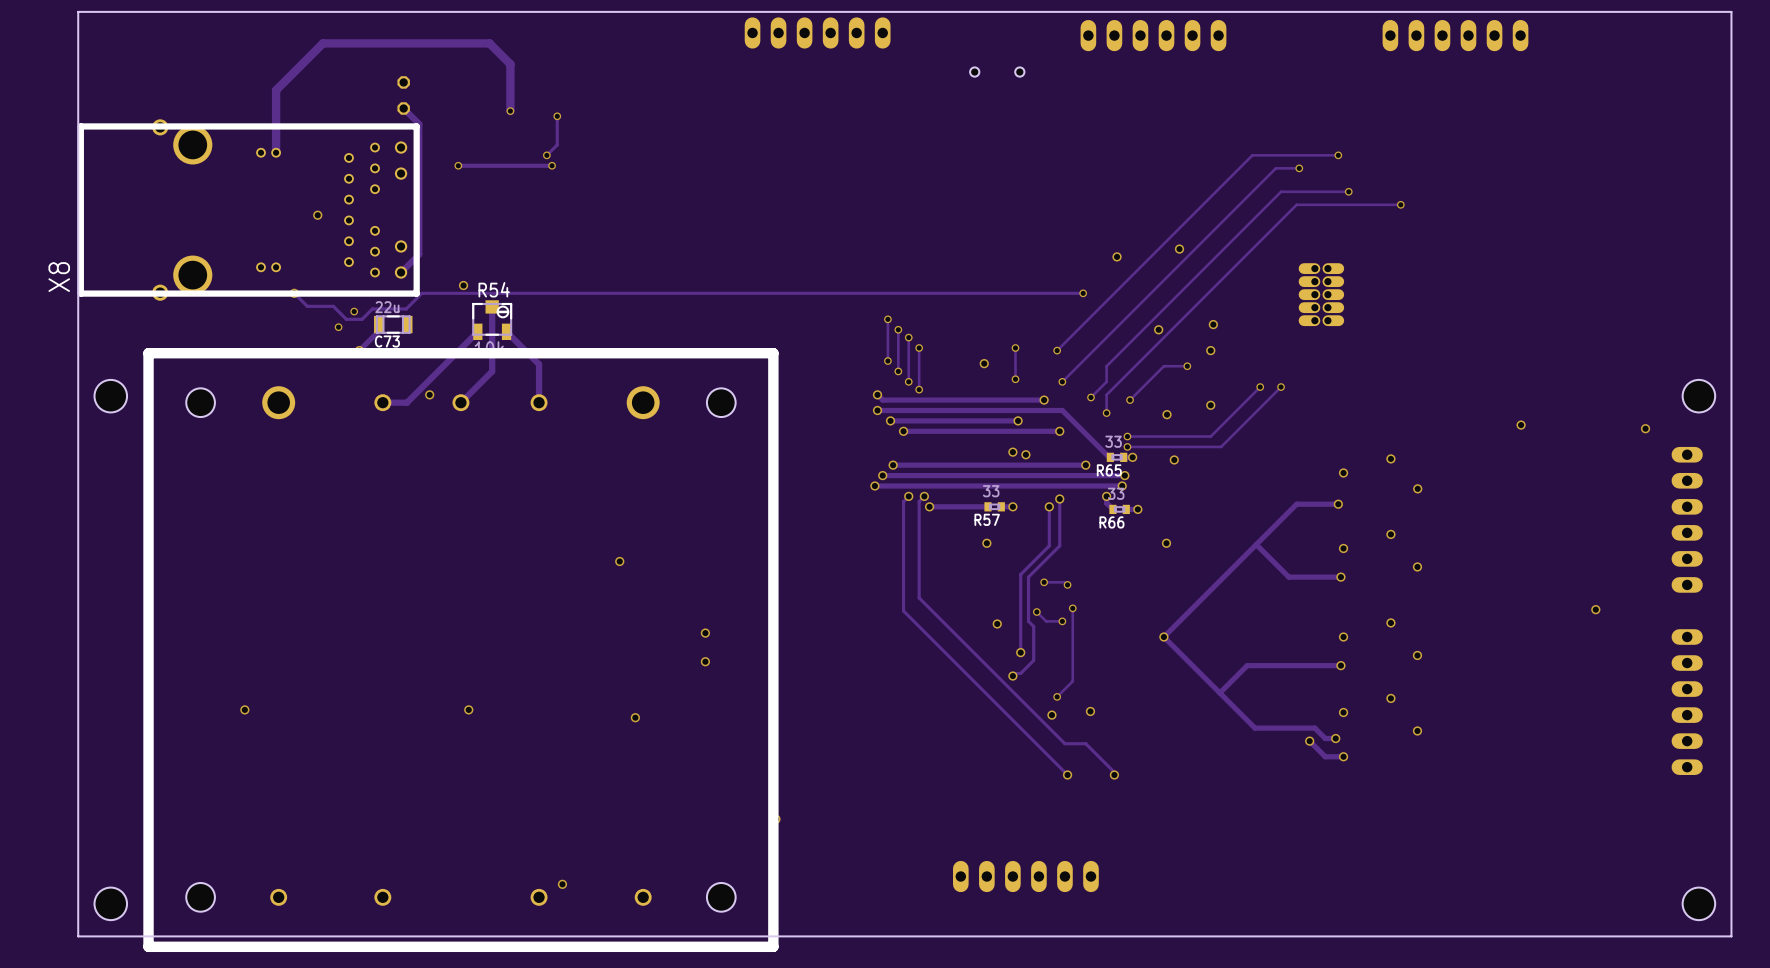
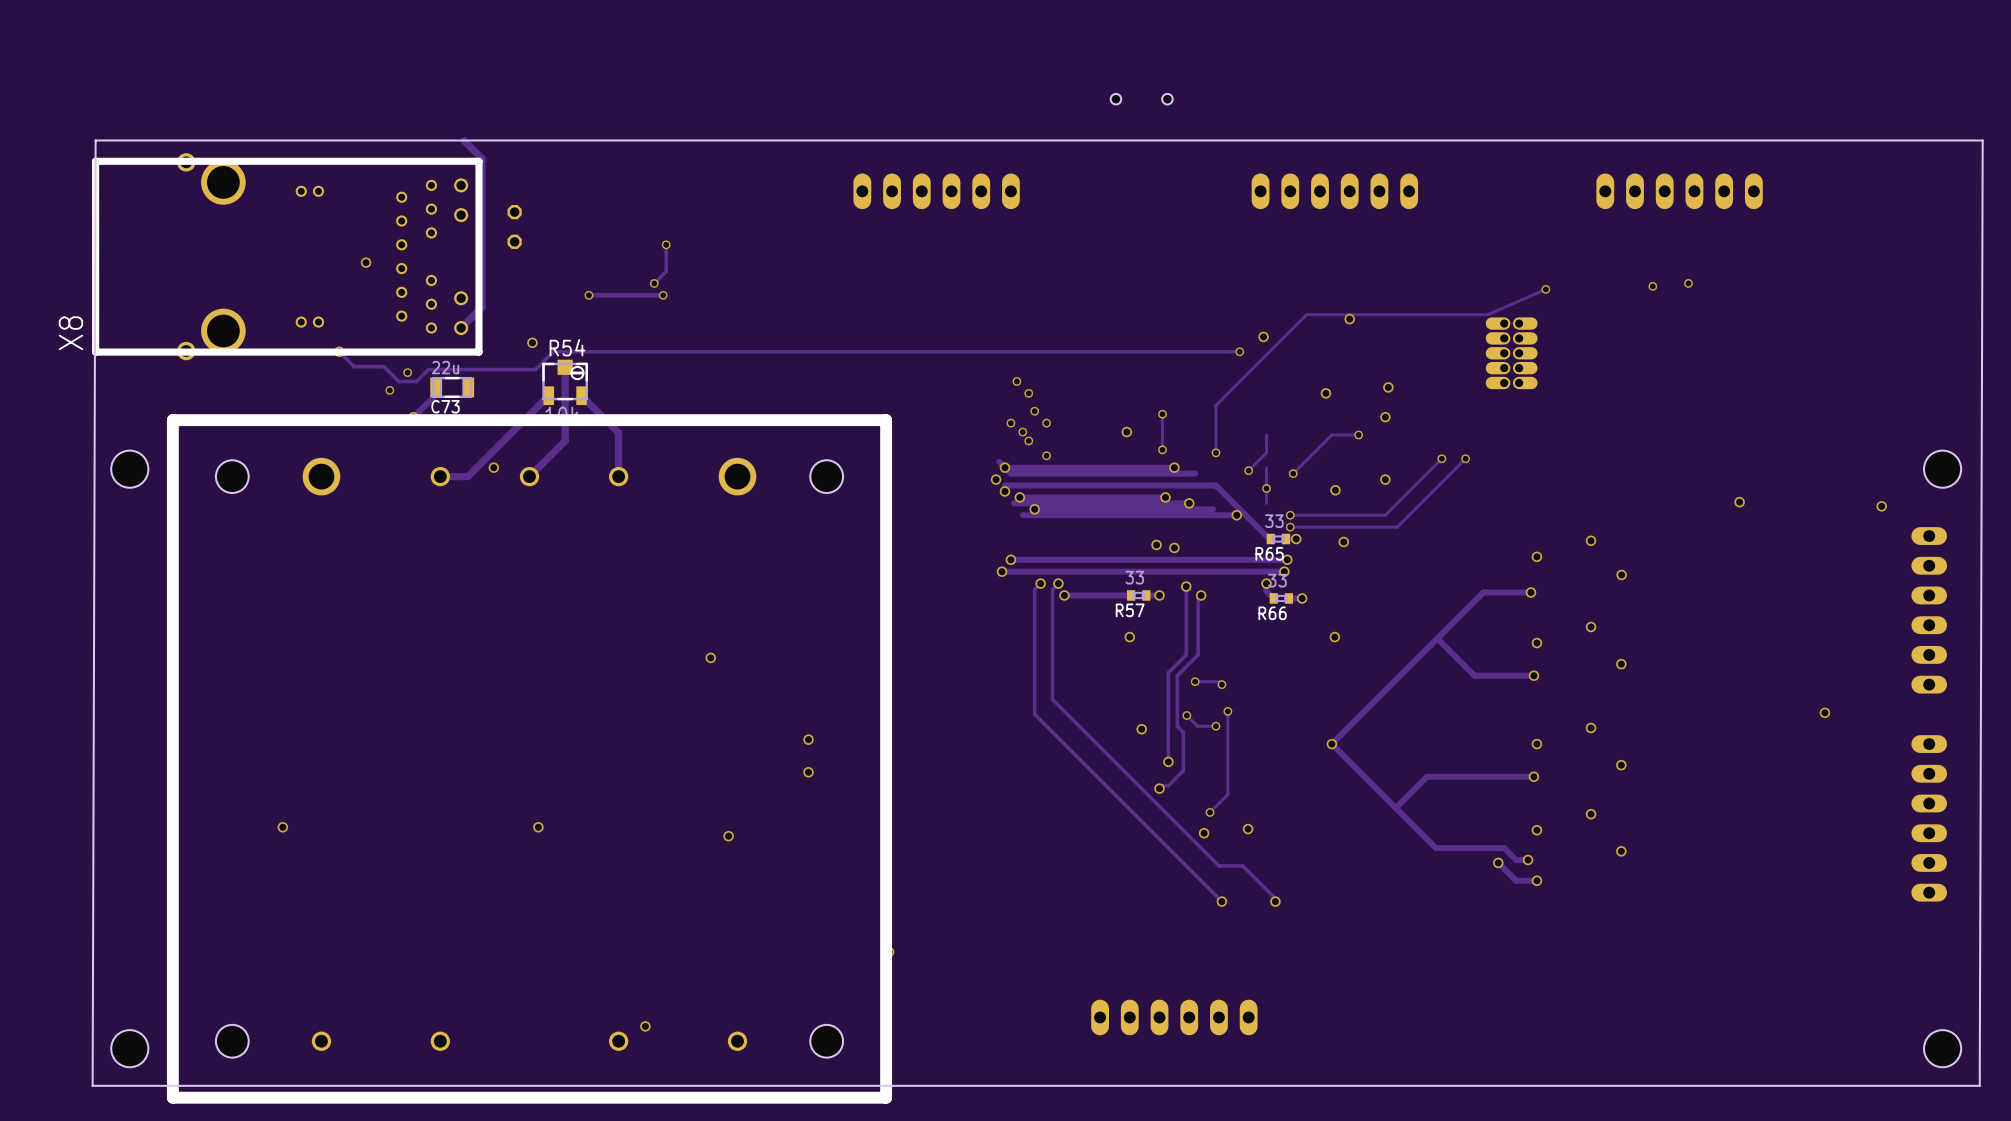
part position: (817, 32) -> (936, 191)
part position: (1153, 35) -> (1334, 191)
part position: (1455, 35) -> (1679, 191)
part position: (403, 95) -> (514, 226)
track: (510, 111) (510, 64) (489, 43) (322, 43) (276, 90) (276, 152) -> none
via: (510, 111) -> none
track: (557, 116) (557, 144) (546, 155) -> none
via: (557, 116) -> none
via: (546, 155) -> none
track: (1338, 155) (1252, 155) (1057, 350) -> none
via: (1338, 155) -> none
via: (458, 165) -> none
track: (552, 165) (458, 165) -> none
via: (552, 165) -> none
track: (1299, 168) (1275, 168) (1062, 381) -> (1545, 289) (1487, 314) (1306, 314) (1215, 405) (1215, 452)
via: (1299, 168) -> none
track: (1348, 191) (1281, 191) (1106, 366) -> none
via: (1348, 191) -> none
track: none -> (666, 244) (666, 271) (654, 283)
via: none -> (666, 244)
track: (1400, 204) (1296, 204) (1106, 394) -> none
via: (1400, 204) -> none
via: none -> (654, 283)
via: none -> (1688, 283)
via: none -> (1652, 286)
via: none -> (1545, 289)
via: none -> (588, 295)
track: none -> (663, 295) (588, 295)
via: none -> (663, 295)
via position: (1179, 249) -> (1349, 319)
via position: (1117, 256) -> (1263, 336)
track: (481, 293) (421, 293) (406, 308) -> (553, 351) (535, 369) (467, 369)
track: (887, 319) (887, 361) -> none
track: (898, 329) (898, 371) -> none
track: (908, 337) (908, 381) -> none
via: (908, 337) -> none
via: none -> (1034, 411)
track: (919, 348) (919, 389) -> none
via: (919, 348) -> none
via: (1057, 350) -> none
via: none -> (1010, 423)
via: none -> (1046, 423)
via: (887, 361) -> none
via: none -> (1022, 432)
via: (908, 381) -> none
via: none -> (1046, 455)
track: none -> (999, 461) (1004, 467) (1174, 467)
via: (919, 389) -> none
via: none -> (1174, 467)
via: (1044, 400) -> none
via: none -> (996, 479)
via: (877, 410) -> none
track: none -> (1266, 488) (1266, 503)
via: none -> (1004, 491)
track: none -> (1189, 503) (1013, 503)
via: none -> (1189, 503)
via: (1059, 431) -> none
track: none -> (1236, 515) (1022, 515)
via: none -> (1236, 515)
via: (1012, 452) -> none
via: (1025, 454) -> none
via: none -> (1156, 544)
via: (893, 465) -> none
via: none -> (1174, 547)
track: (1085, 465) (893, 465) -> none
via: (1085, 465) -> none
via: none -> (1186, 586)
track: (1059, 499) (1059, 545) (1046, 558) -> (1198, 595) (1198, 654)
via: (1059, 499) -> none
track: (1049, 506) (1049, 545) (1036, 558) -> (1186, 586) (1186, 654)
board edge: (1731, 936) (1731, 11) (78, 11) (78, 936) -> (1979, 1085) (1982, 140) (95, 140) (92, 1085)

